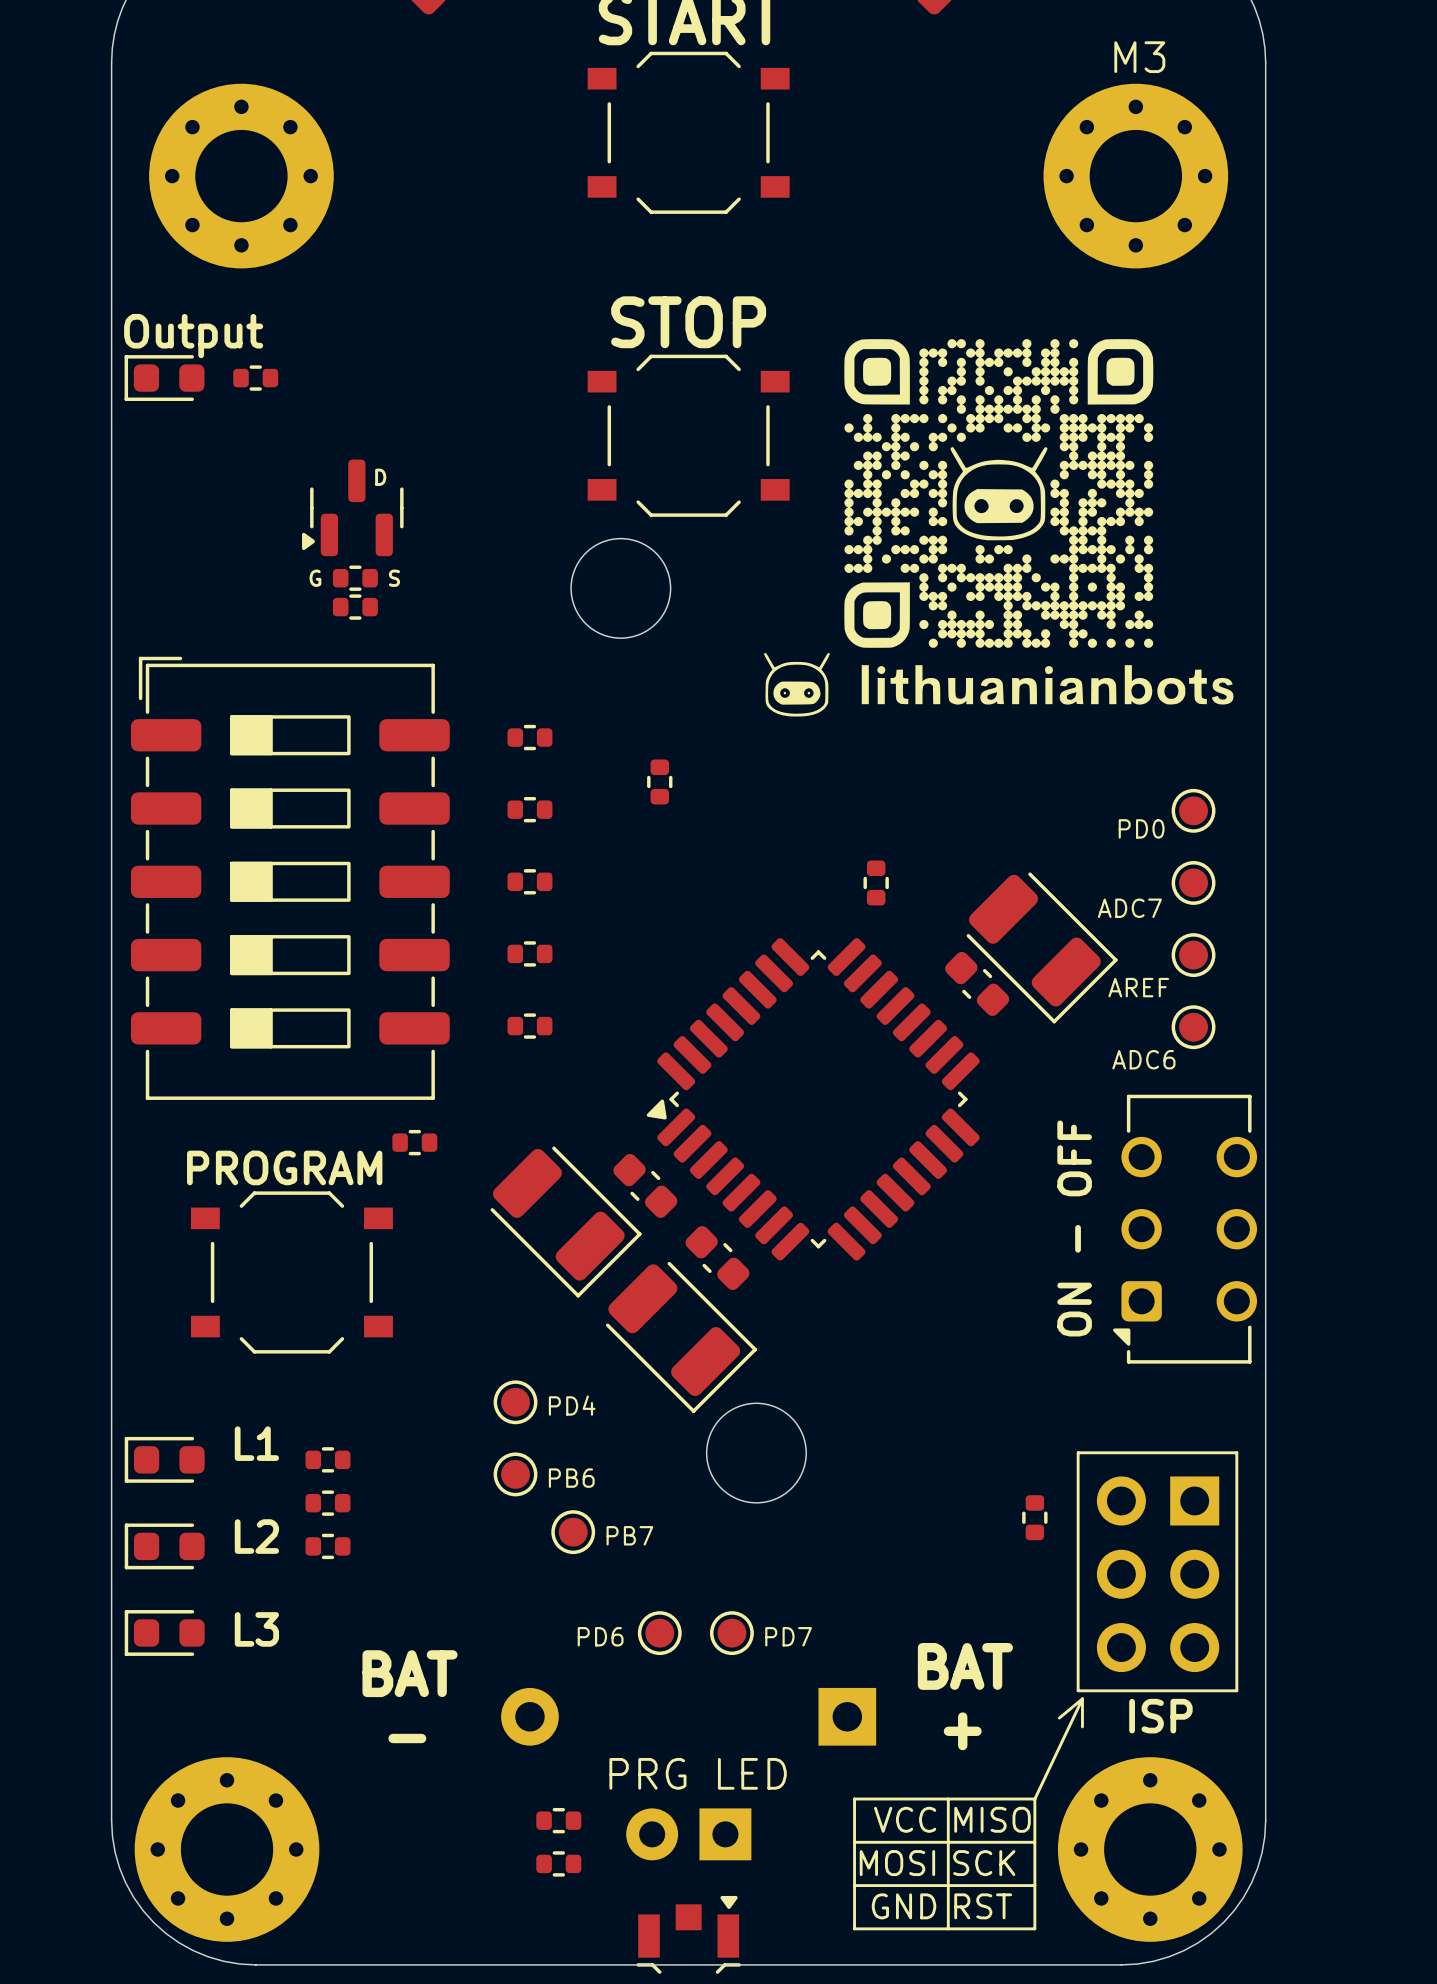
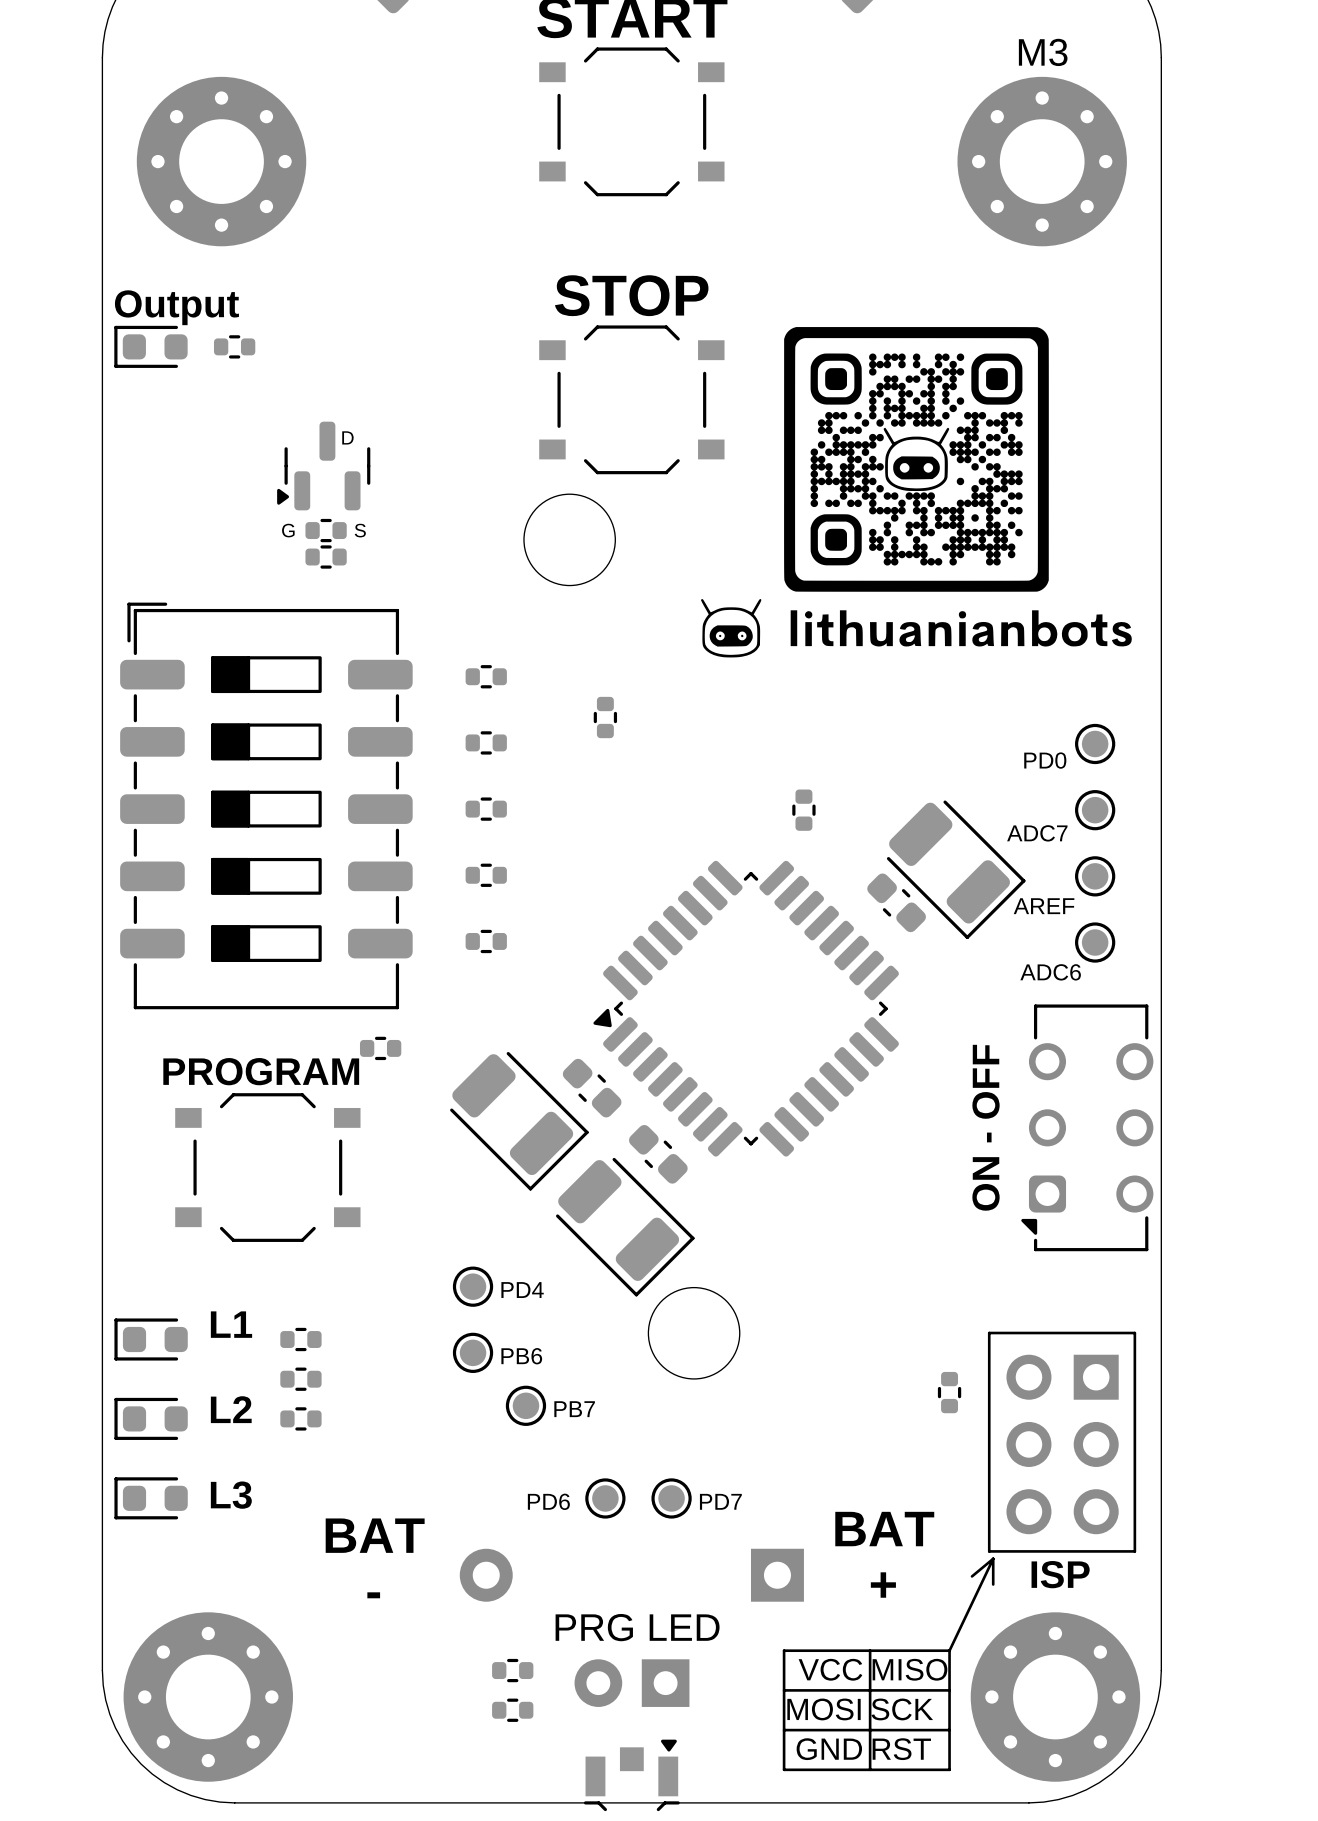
drawing shape: [844, 339, 1154, 648] -> [784, 327, 1049, 592]

